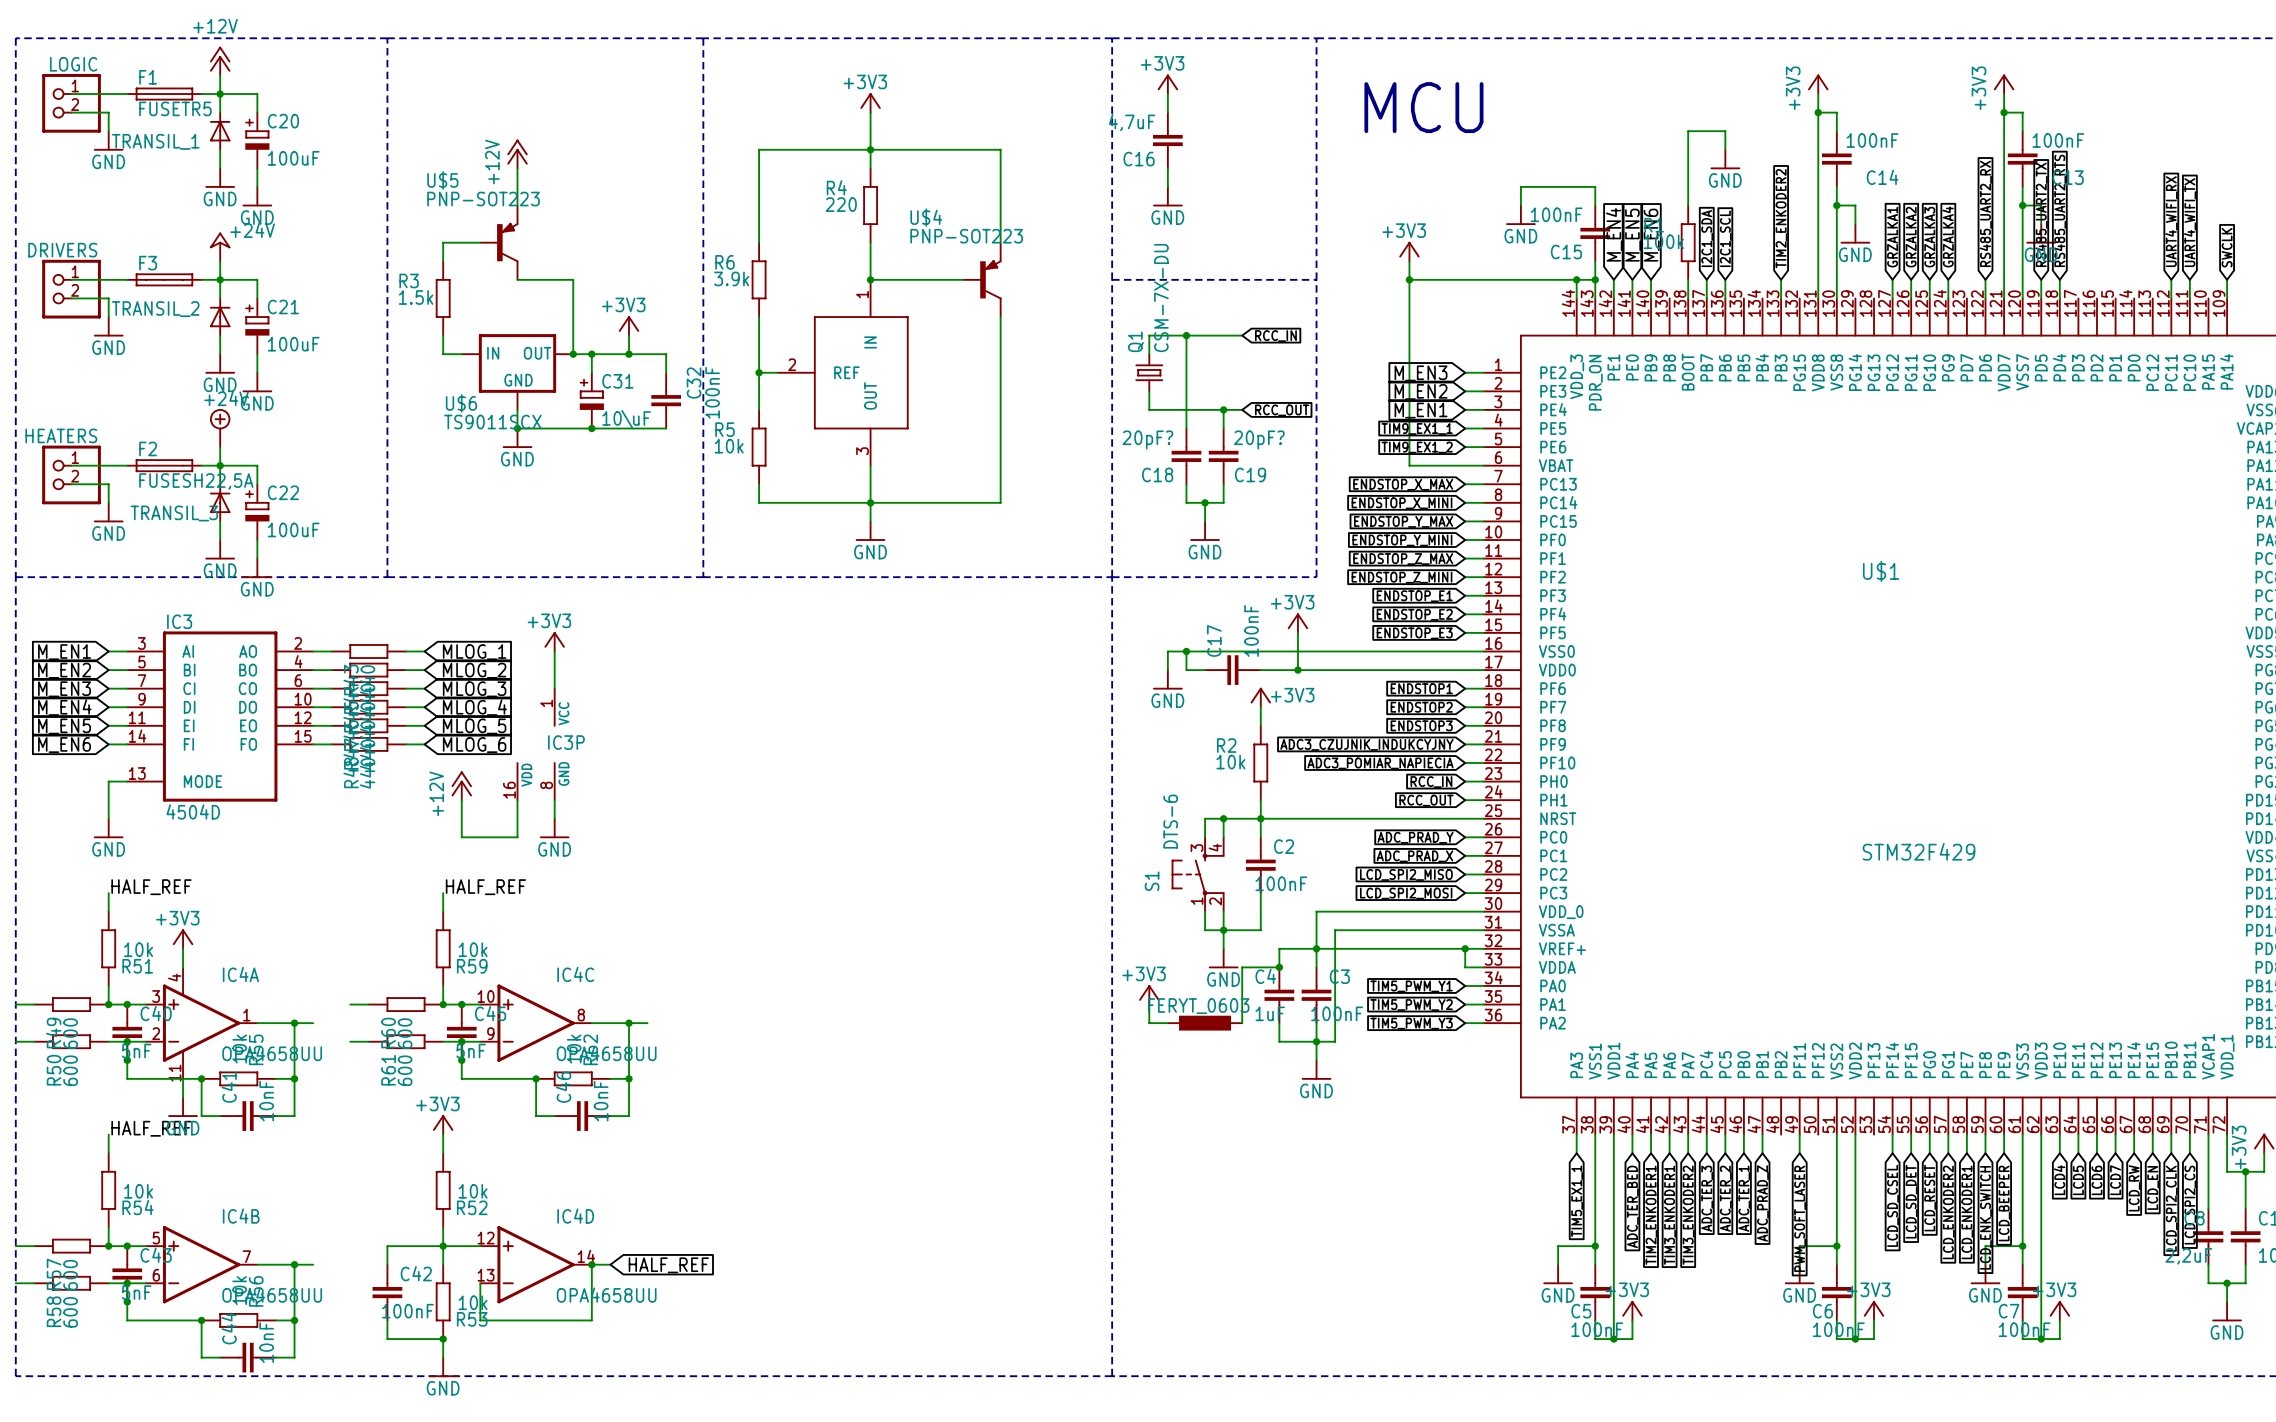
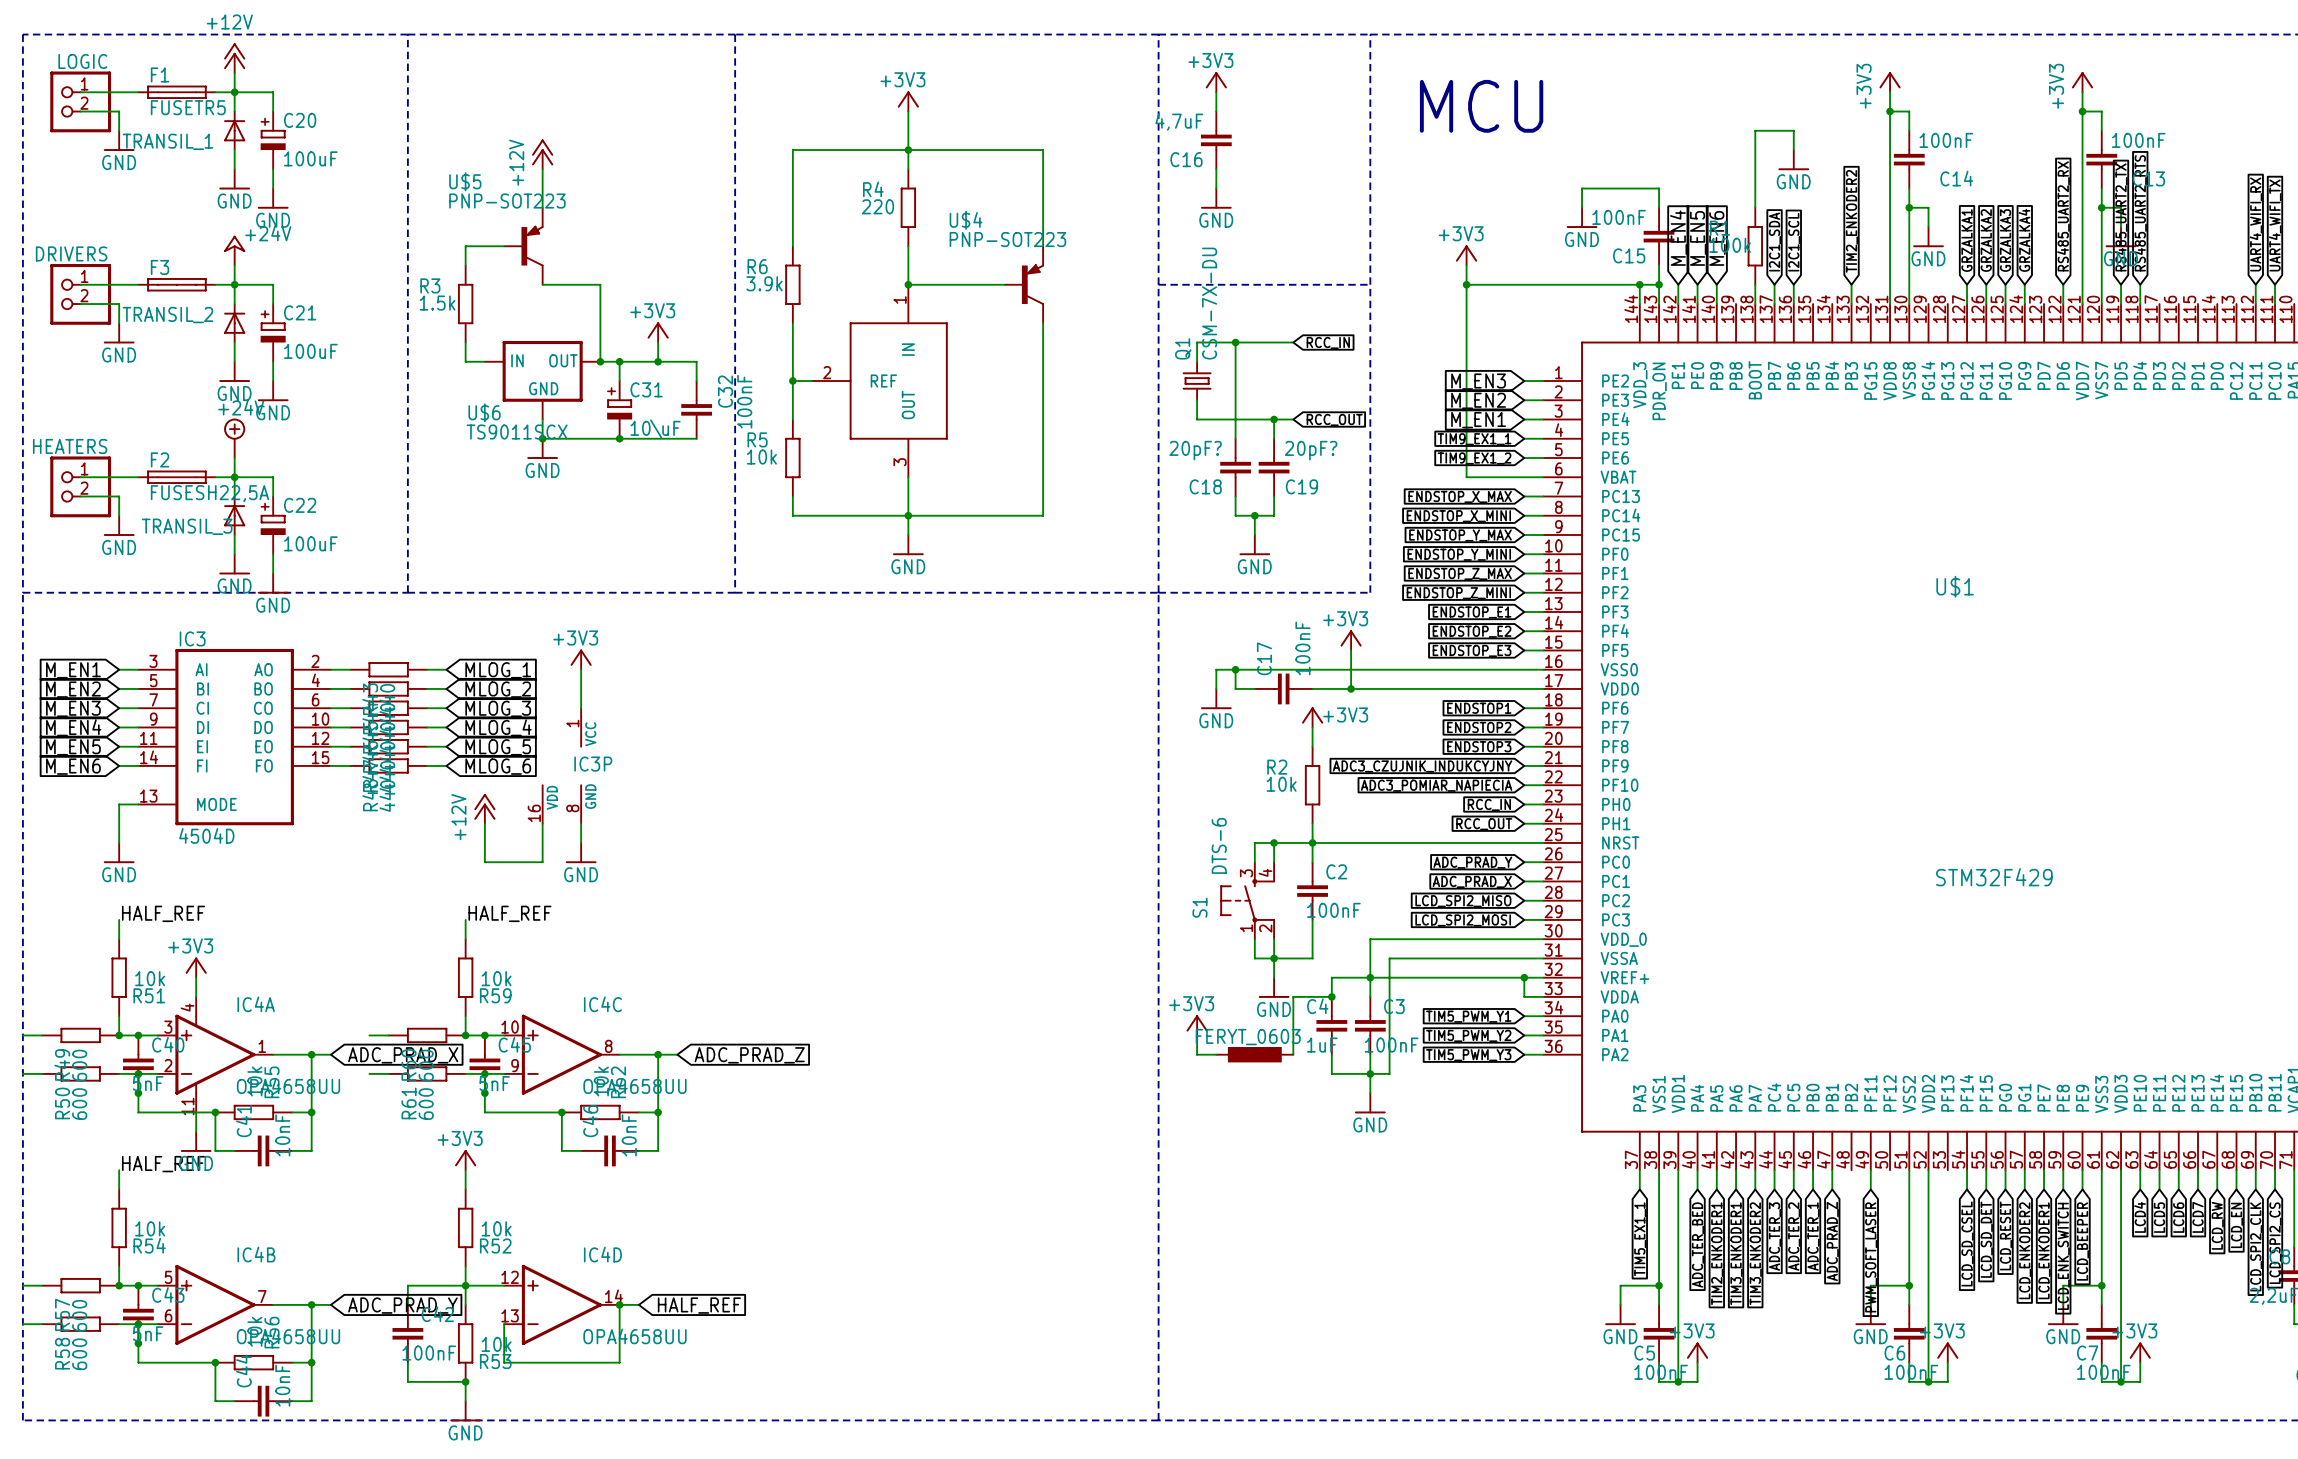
global label: none -> ADC_PRAD_X (403, 1055)
global label: none -> ADC_PRAD_Z (749, 1055)
global label: none -> ADC_PRAD_Y (402, 1305)

